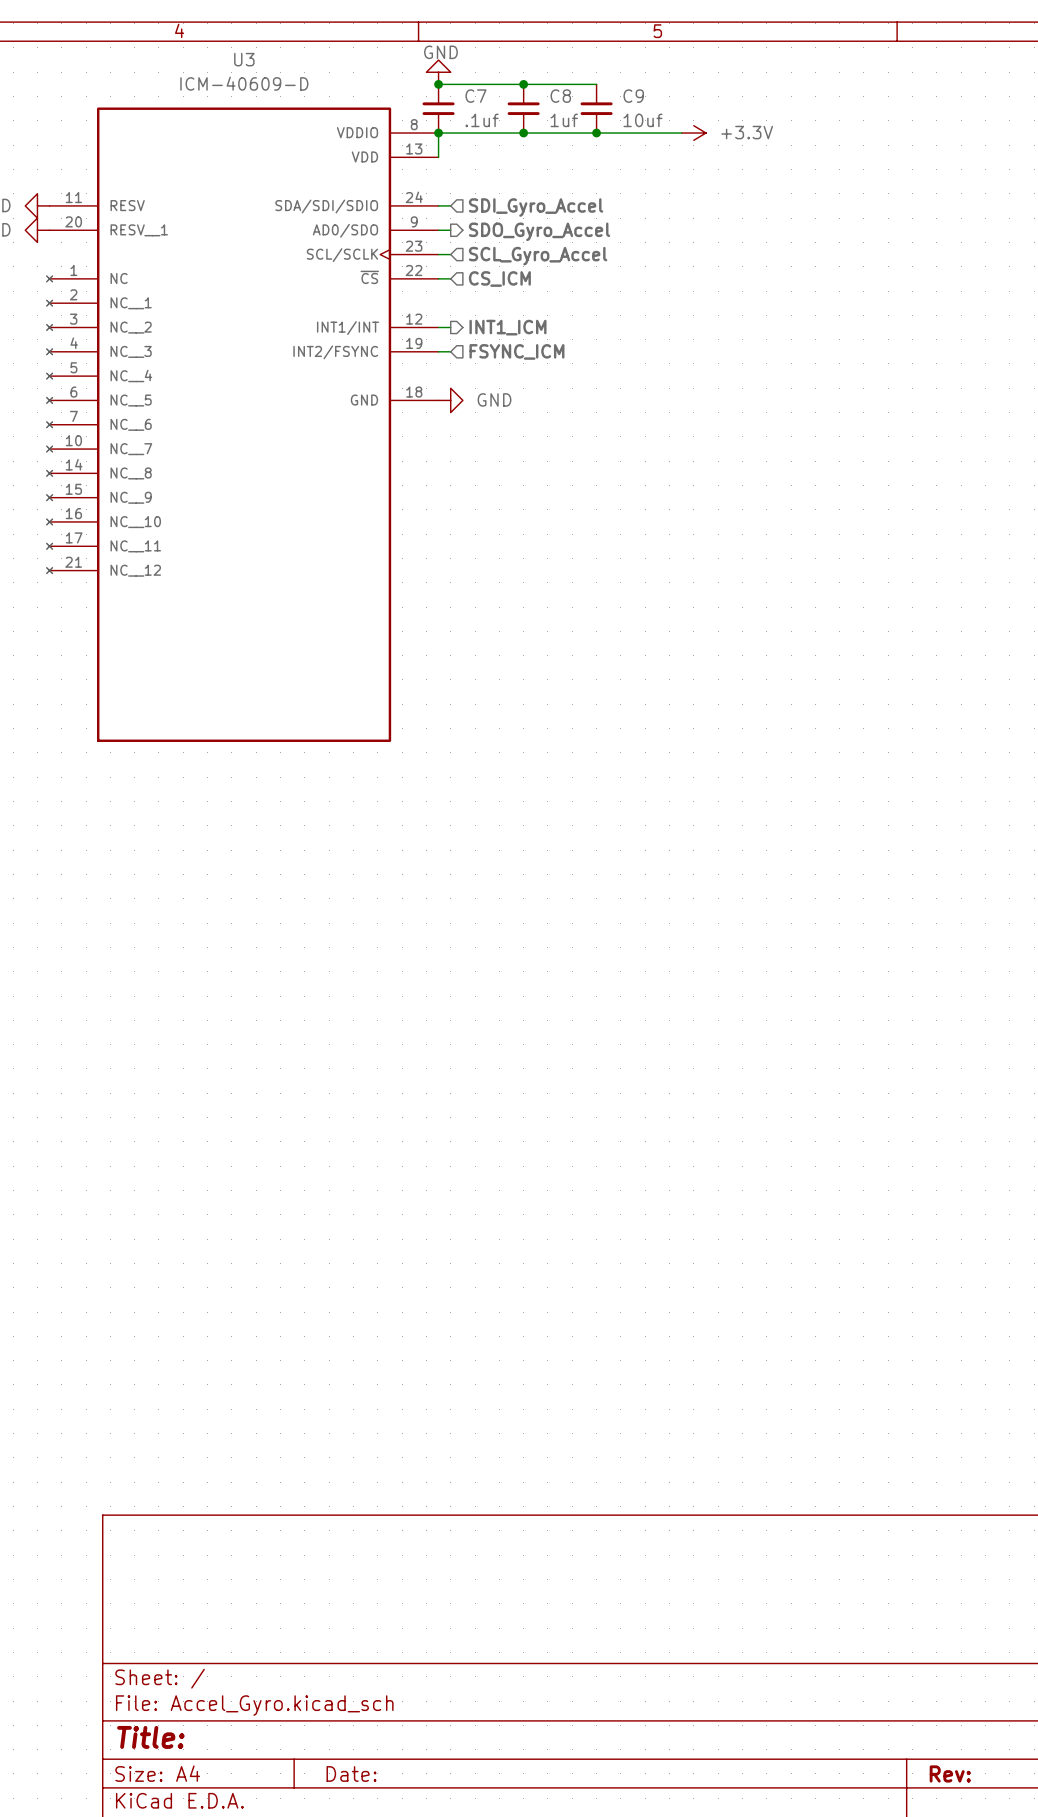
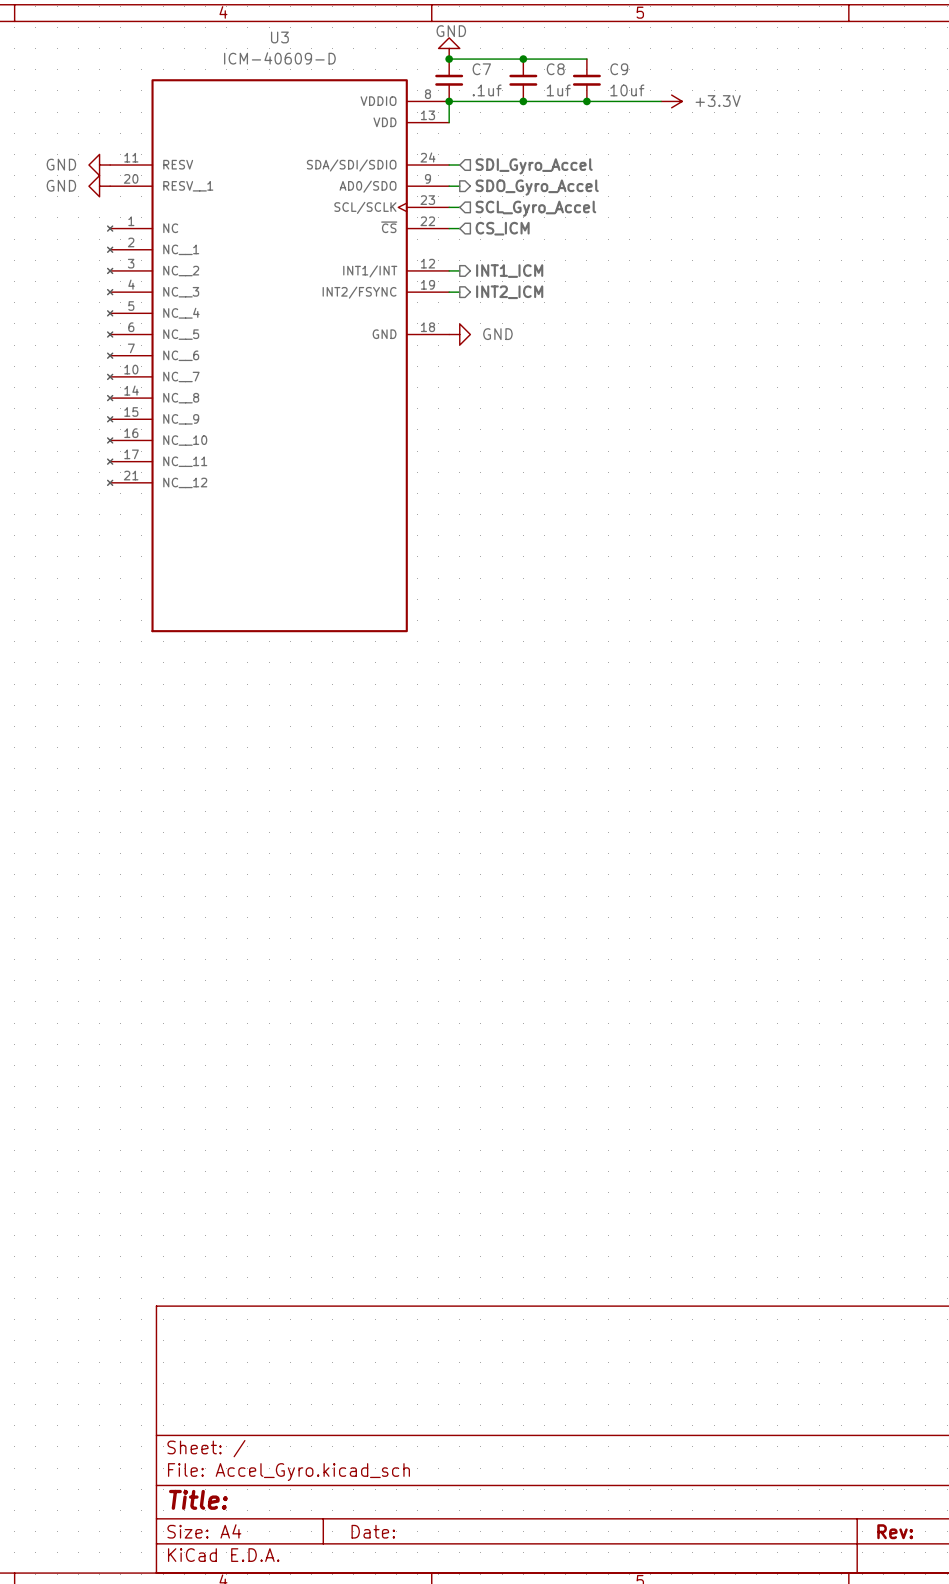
hierarchical label shape: input (516, 351) -> output (509, 292)
hierarchical label: FSYNC_ICM (516, 351) -> INT2_ICM (509, 292)

